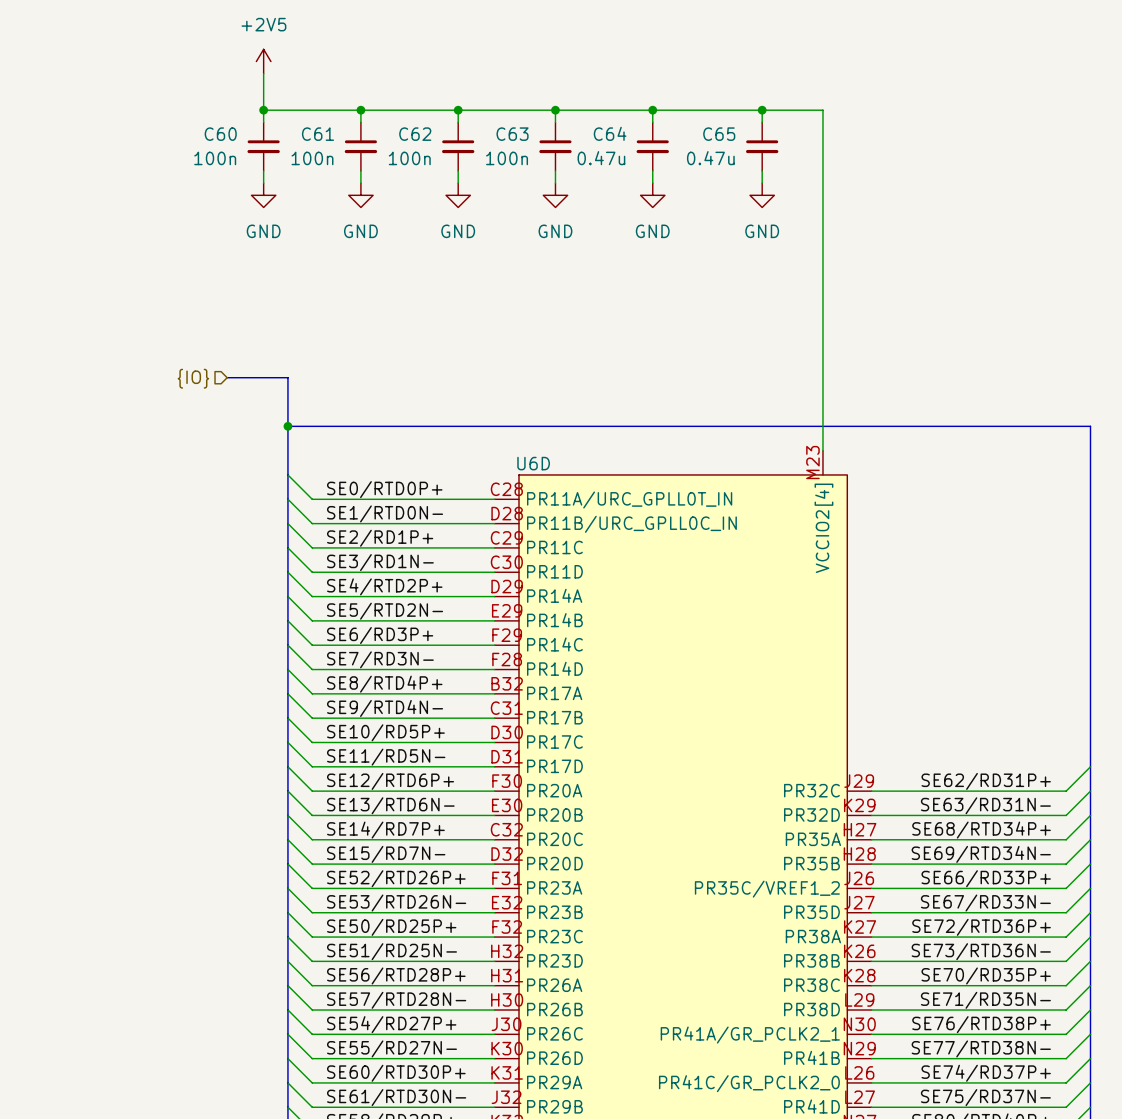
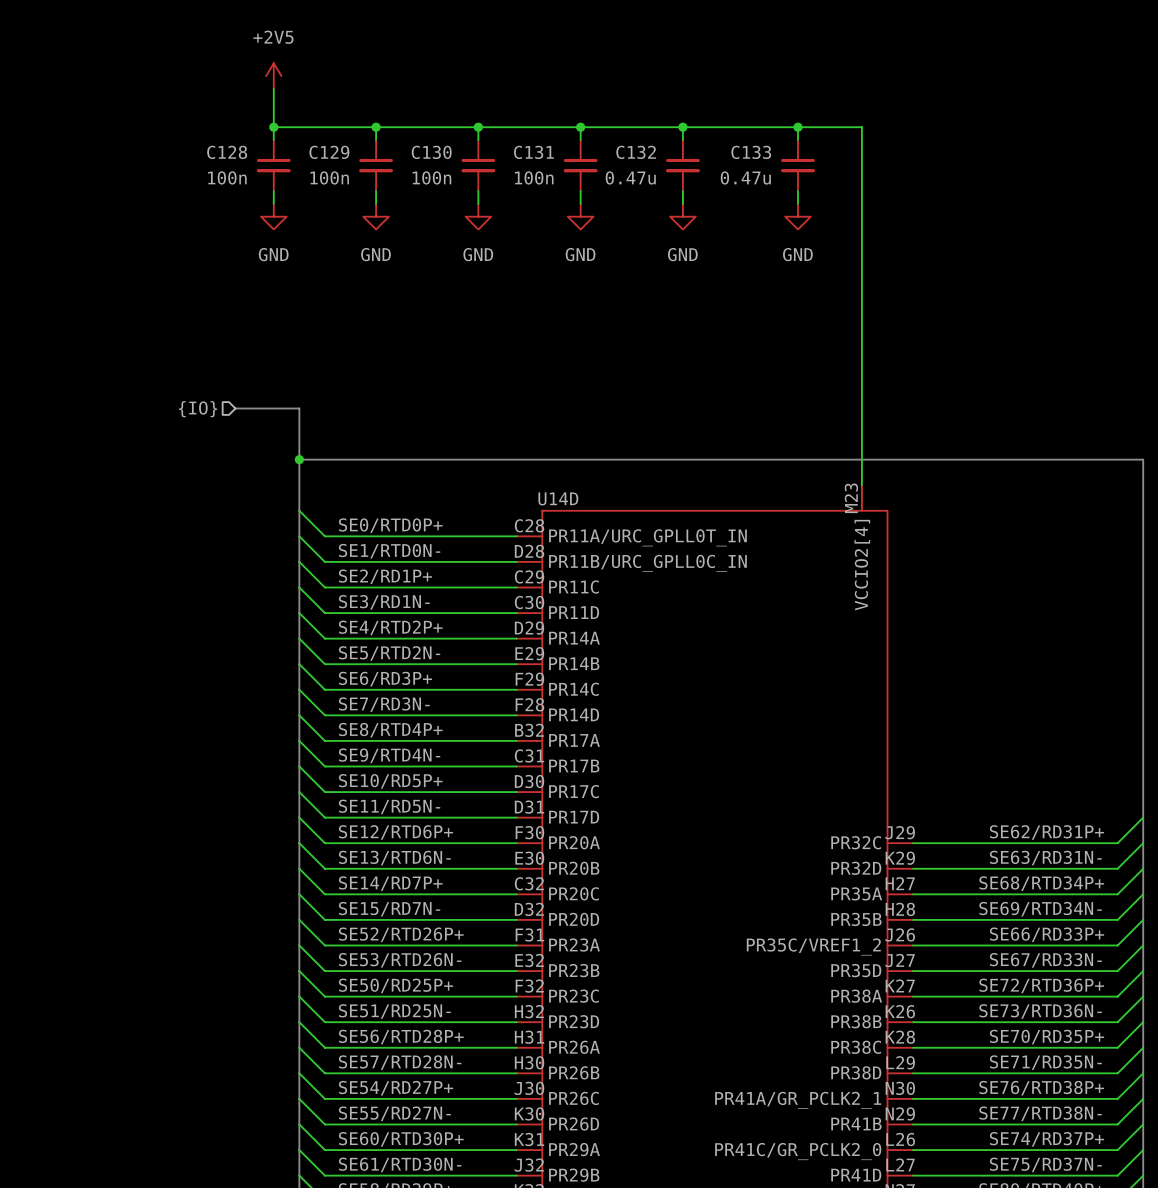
C64 name: C64 (610, 133) -> C132 (636, 152)
C60 name: C60 (220, 134) -> C128 (227, 152)
C61 name: C61 (317, 134) -> C129 (329, 152)
C62 name: C62 (415, 134) -> C130 (431, 152)
C63 name: C63 (512, 134) -> C131 (533, 152)
C65 name: C65 (719, 134) -> C133 (751, 152)
U6D name: U6D (533, 463) -> U14D (558, 498)

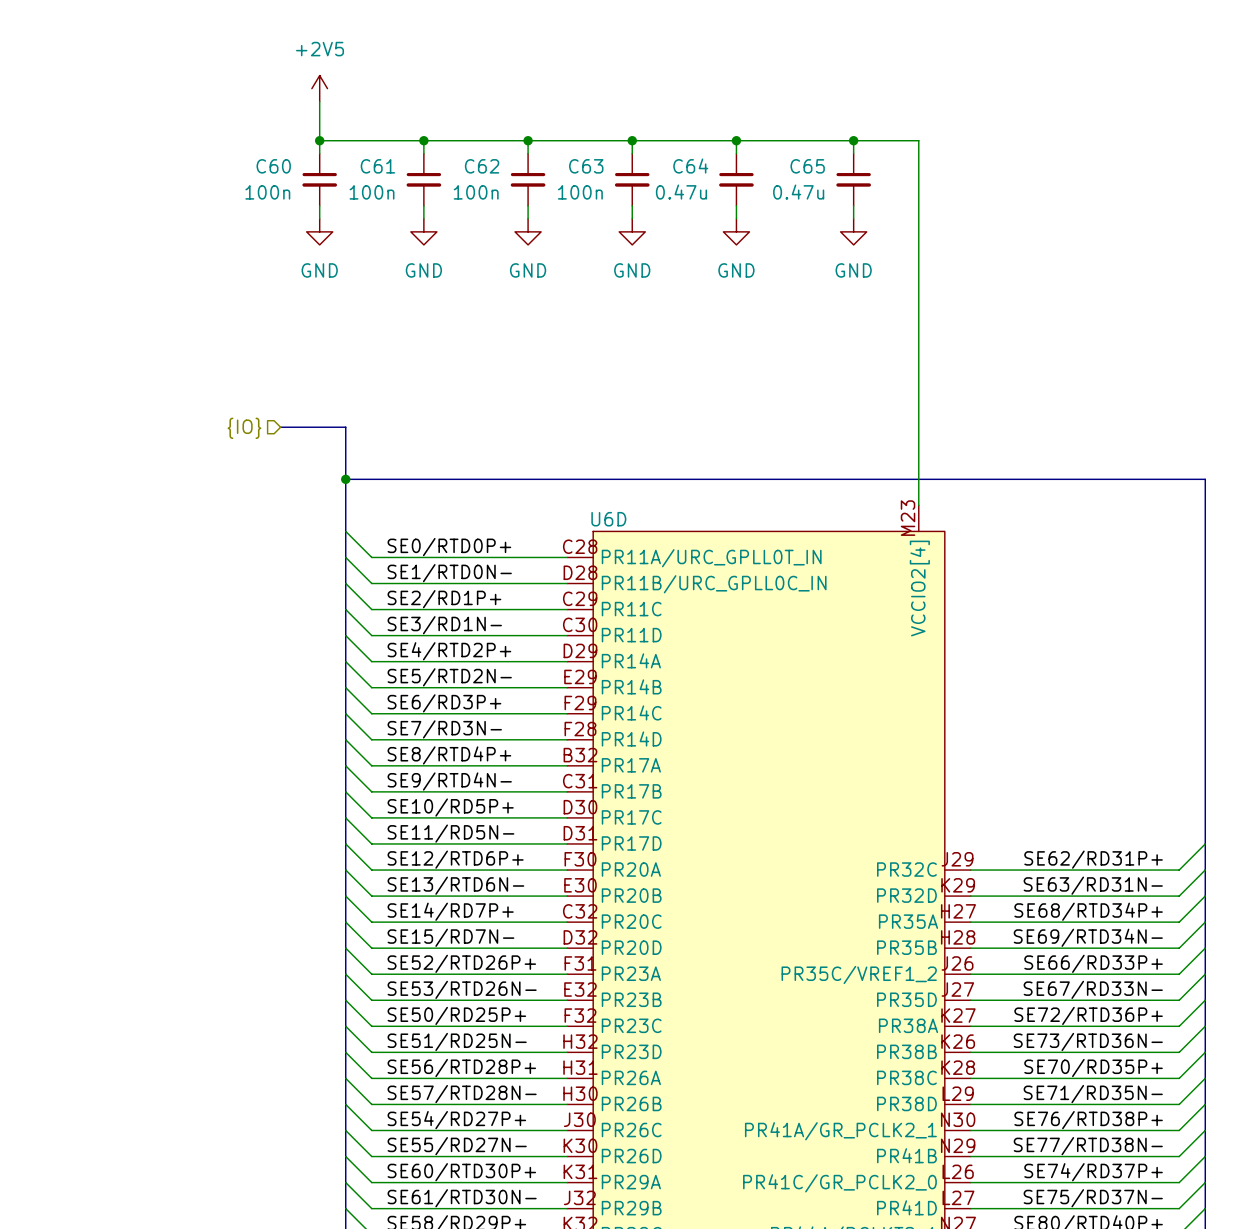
C128 name: C128 (227, 152) -> C60 (273, 166)
C129 name: C129 (329, 152) -> C61 (377, 166)
C130 name: C130 (431, 152) -> C62 (482, 166)
C131 name: C131 (533, 152) -> C63 (586, 166)
C132 name: C132 (636, 152) -> C64 (690, 166)
C133 name: C133 (751, 152) -> C65 (807, 166)
U14D name: U14D (558, 498) -> U6D (608, 519)

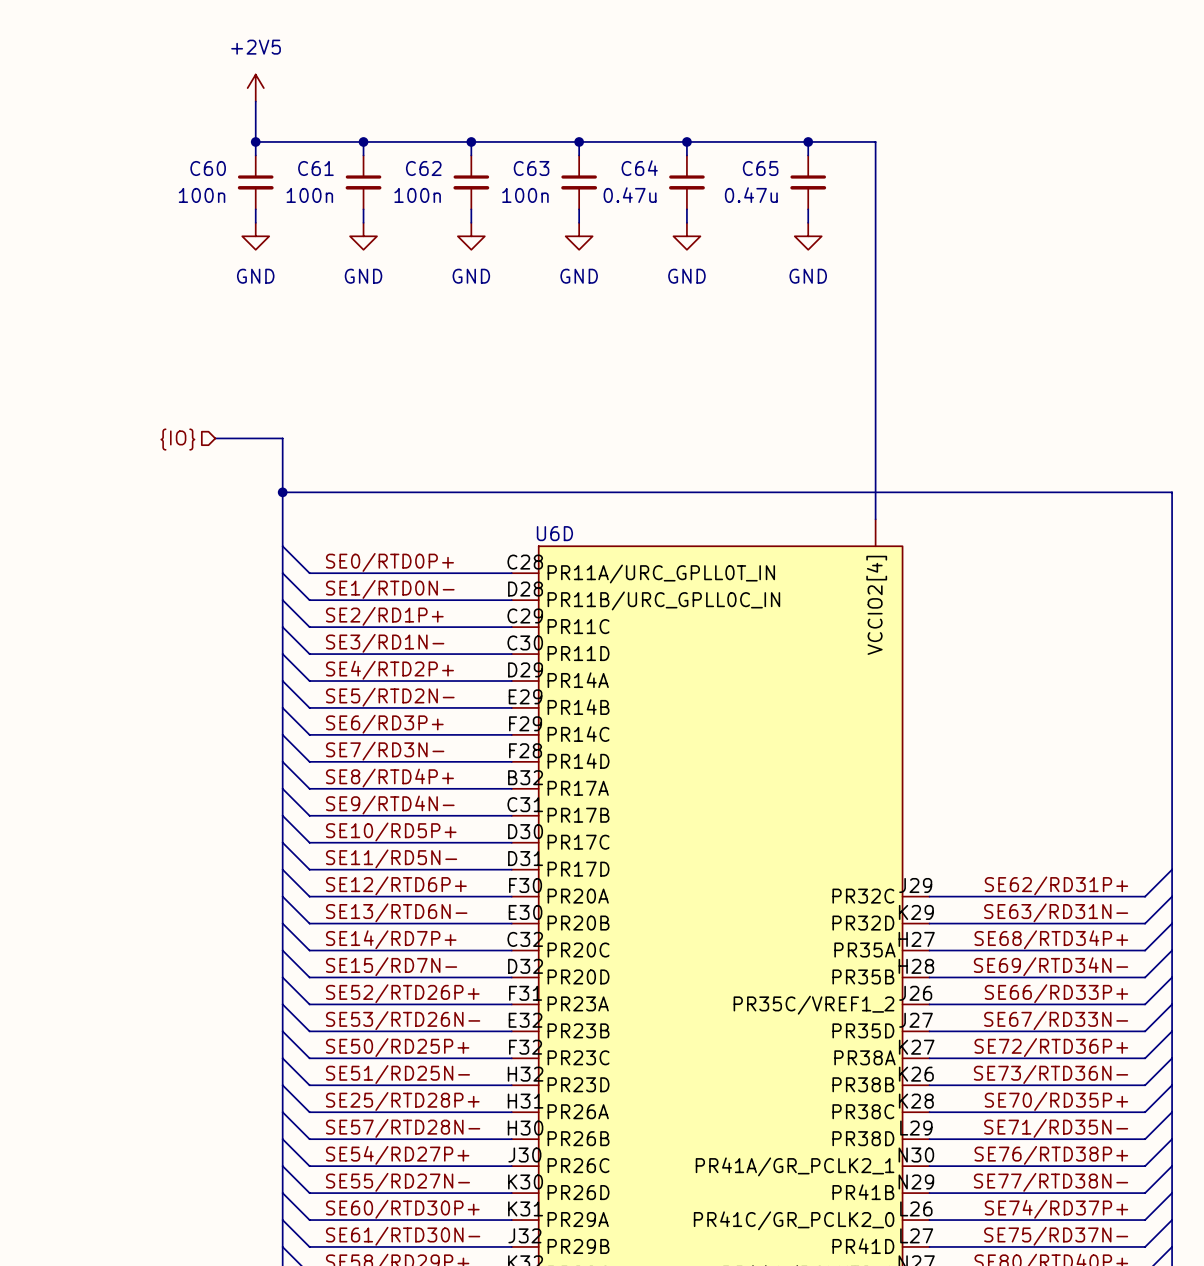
U6D pin number: M23 (908, 518) -> none
label: SE56/RTD28P+ (461, 1068) -> SE25/RTD28P+ (402, 1101)

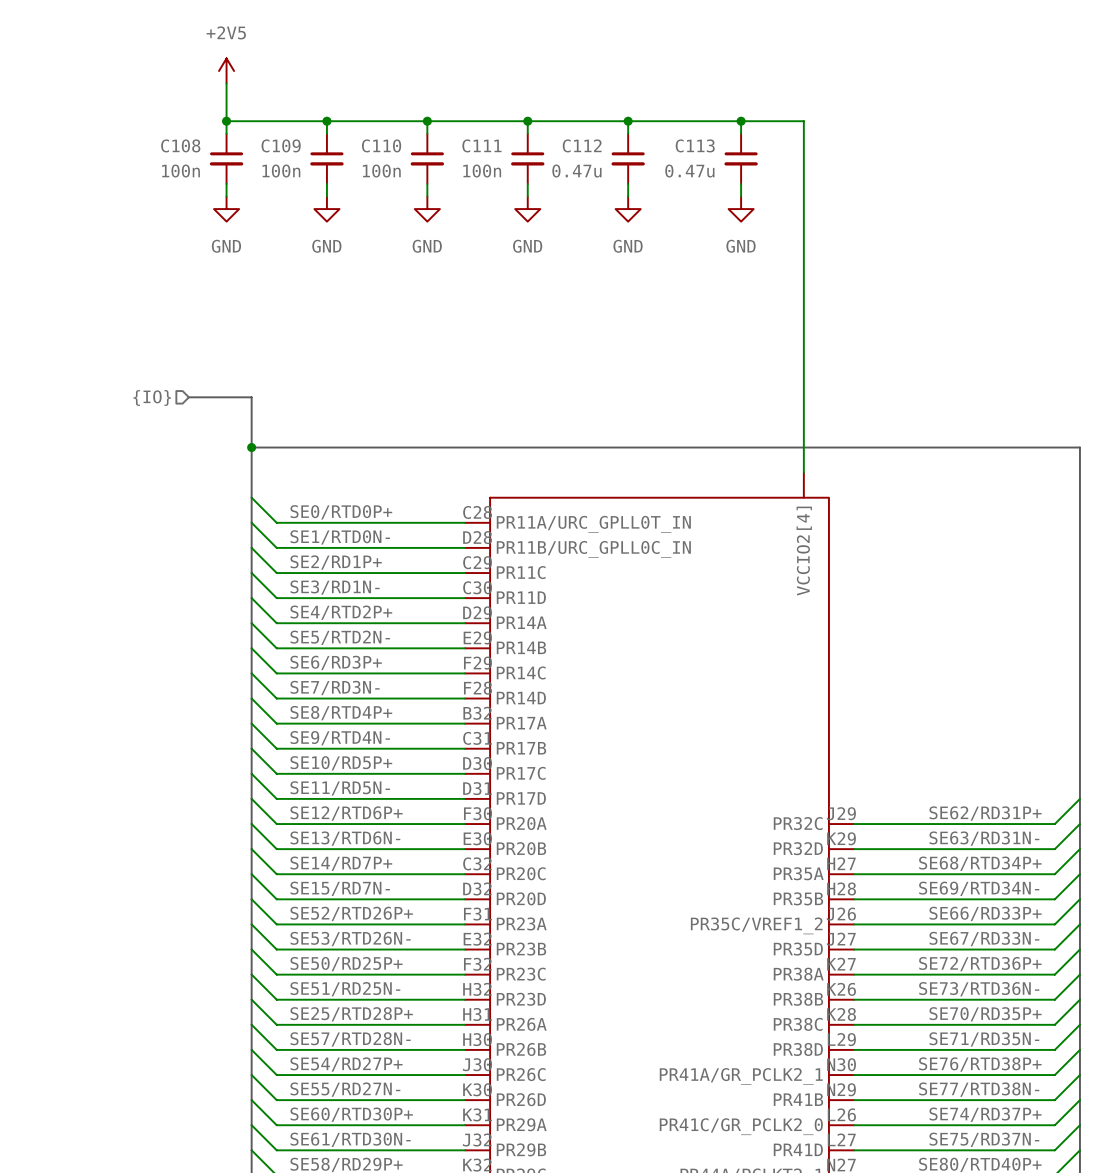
C60 name: C60 (208, 168) -> C108 (180, 145)
C61 name: C61 (315, 168) -> C109 (281, 145)
C62 name: C62 (423, 168) -> C110 (381, 145)
C63 name: C63 (531, 168) -> C111 (481, 145)
C64 name: C64 (639, 168) -> C112 (582, 145)
C65 name: C65 (760, 168) -> C113 (695, 145)
U6D name: U6D (554, 533) -> none

